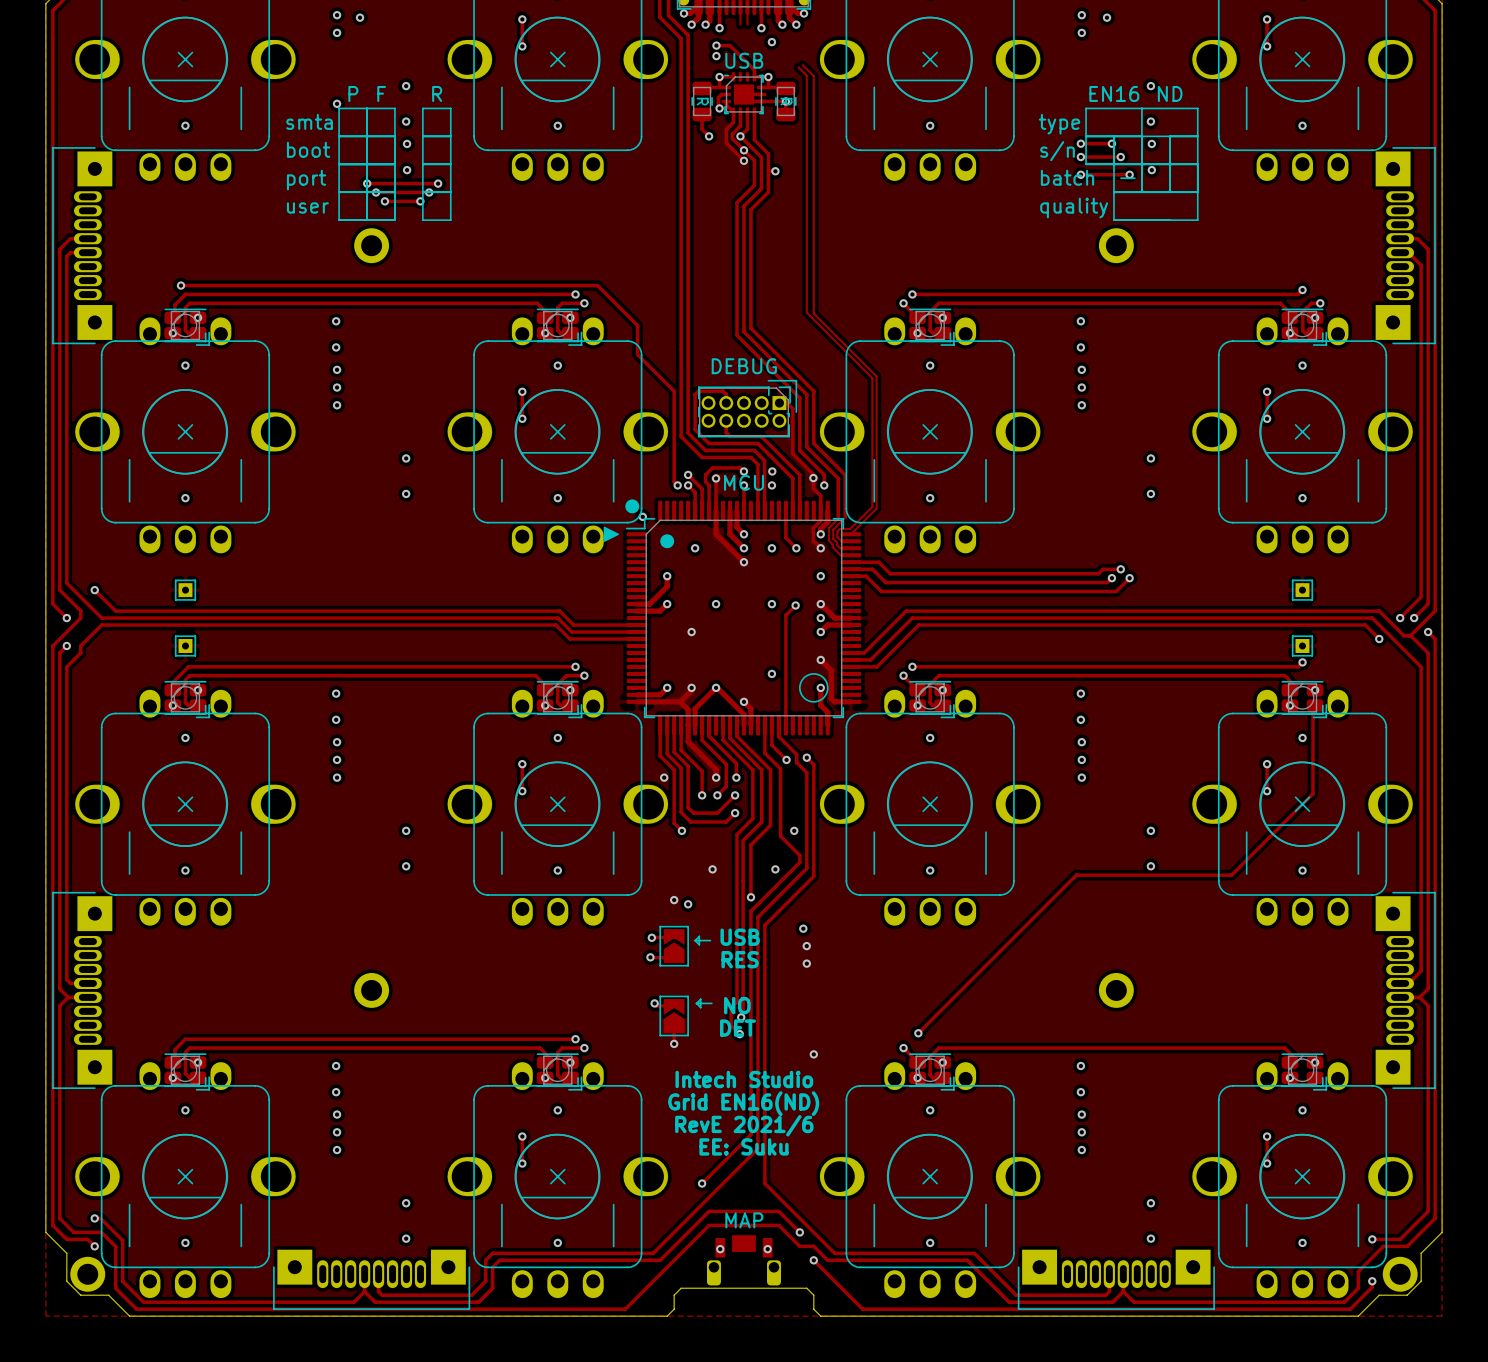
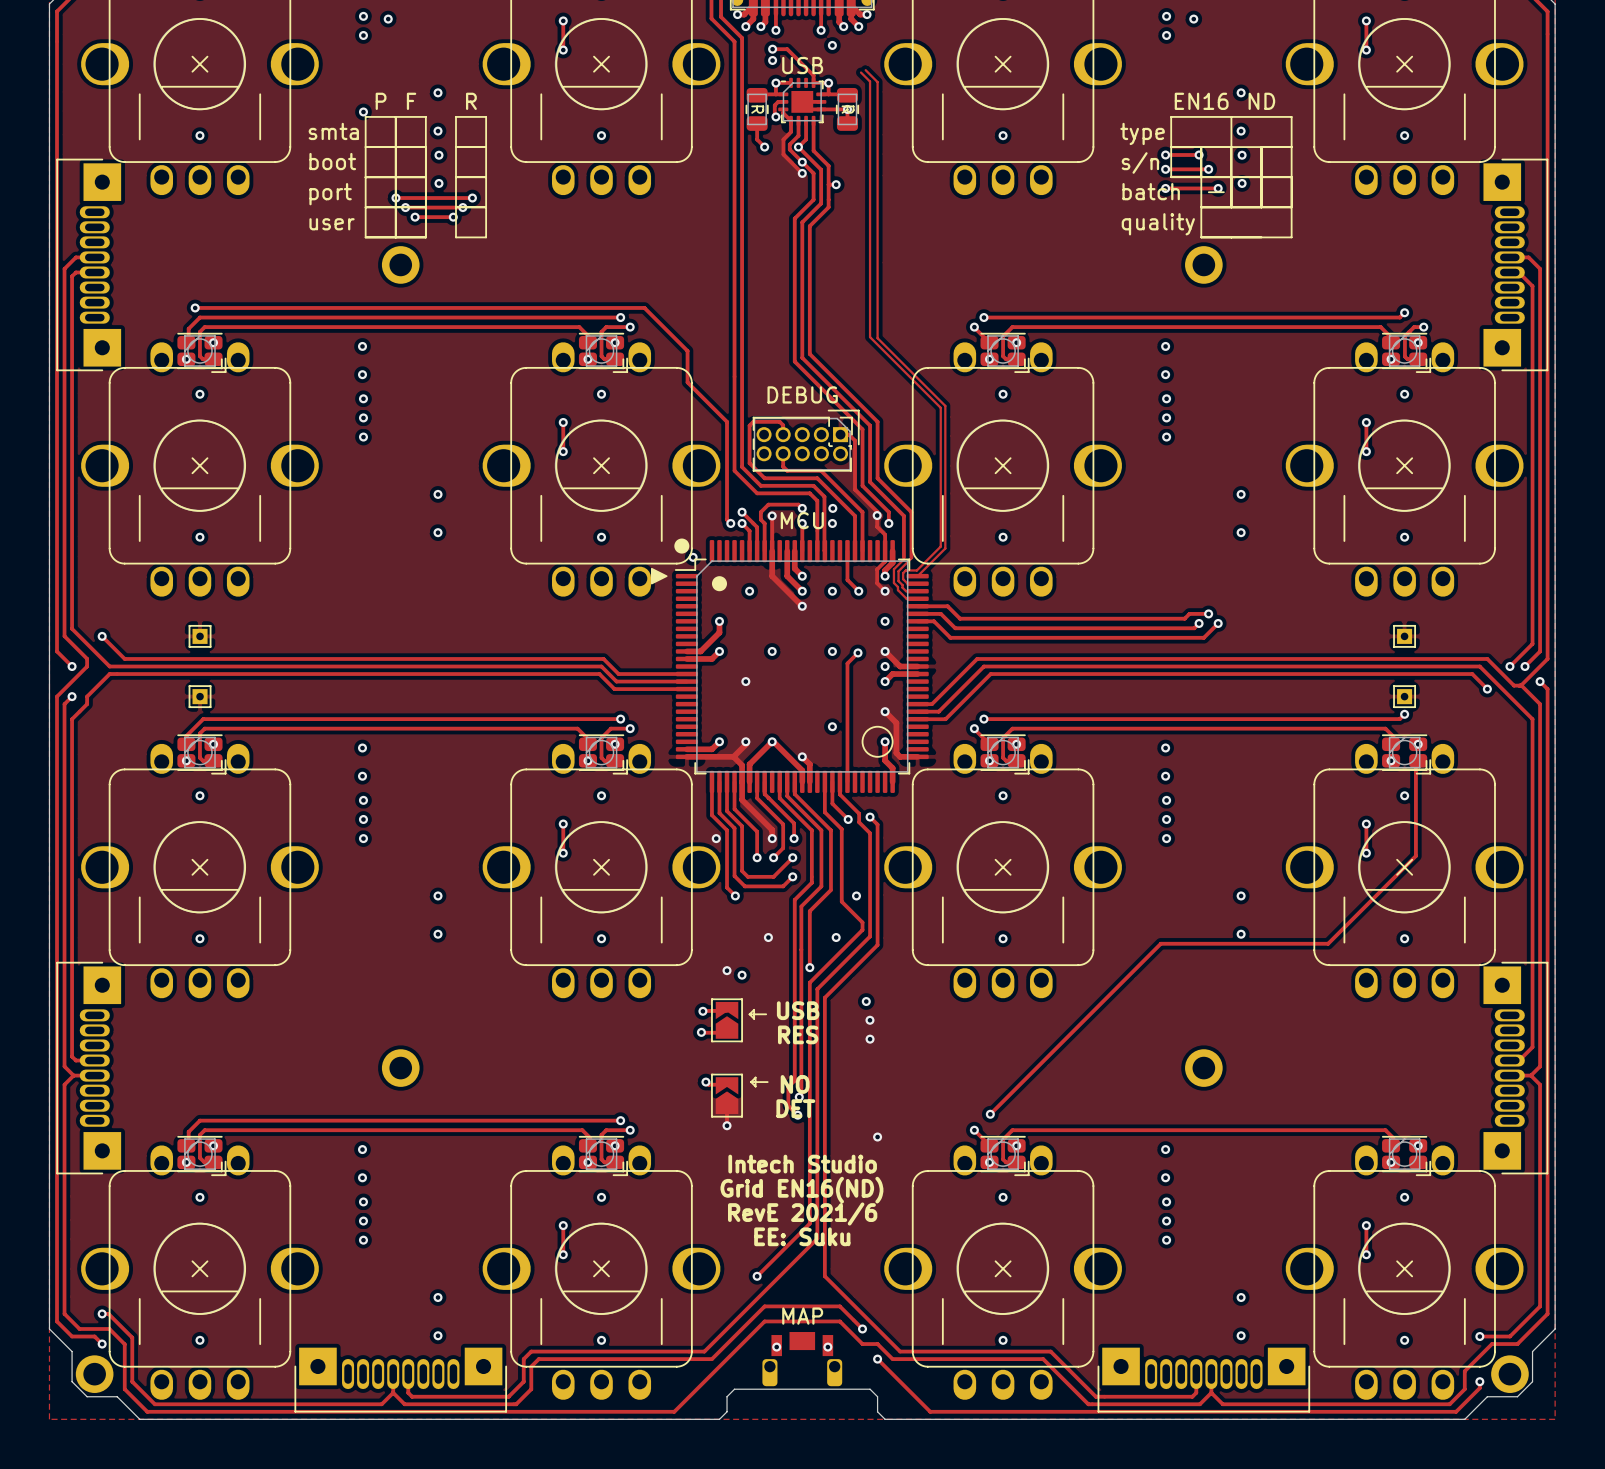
track: (740, 5) (740, 24) -> none
track: (747, 5) (747, 24) -> none

